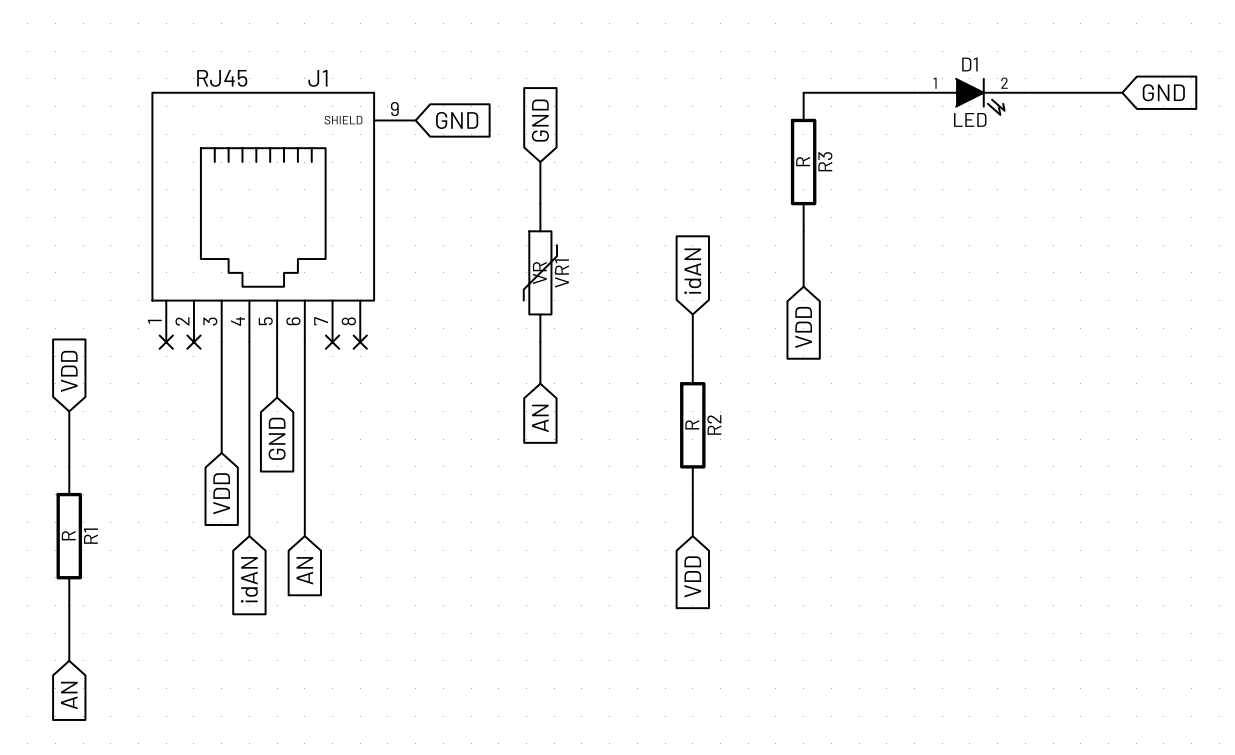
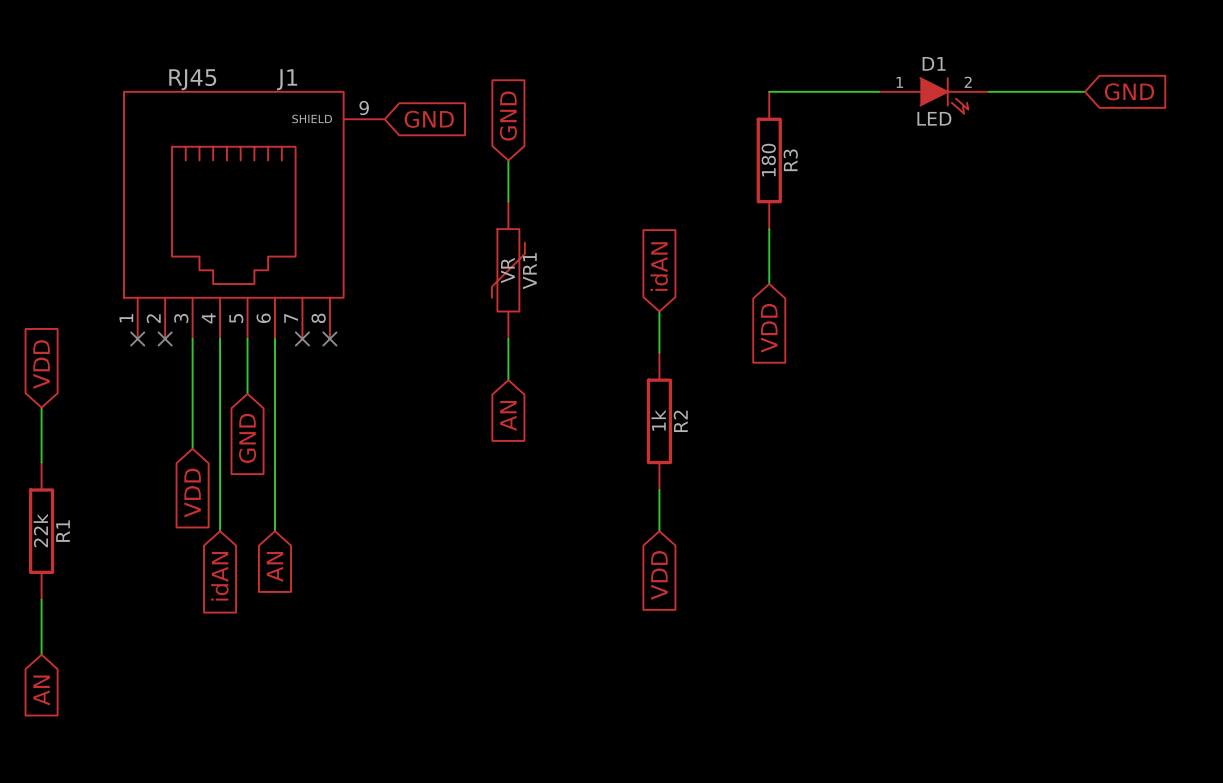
R3 value: R (803, 161) -> 180 (768, 160)
R2 value: R (692, 424) -> 1k (658, 420)
R1 value: R (68, 535) -> 22k (40, 530)

